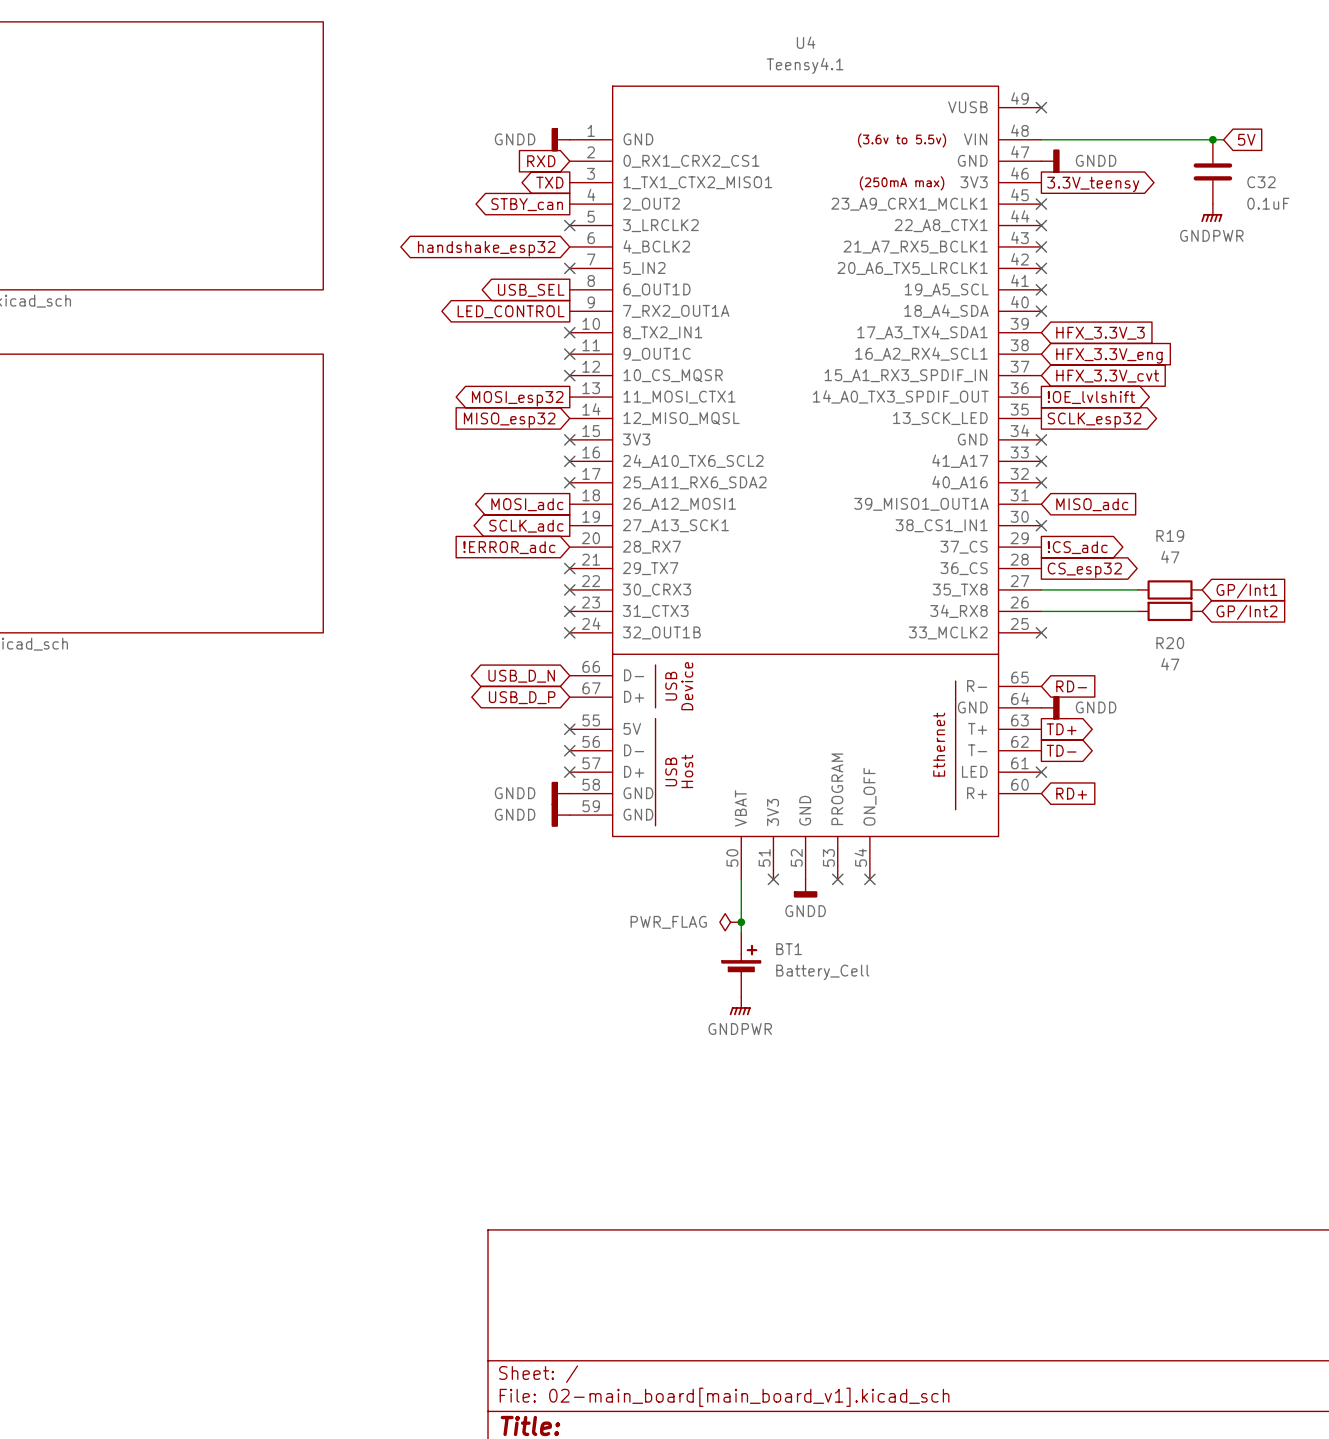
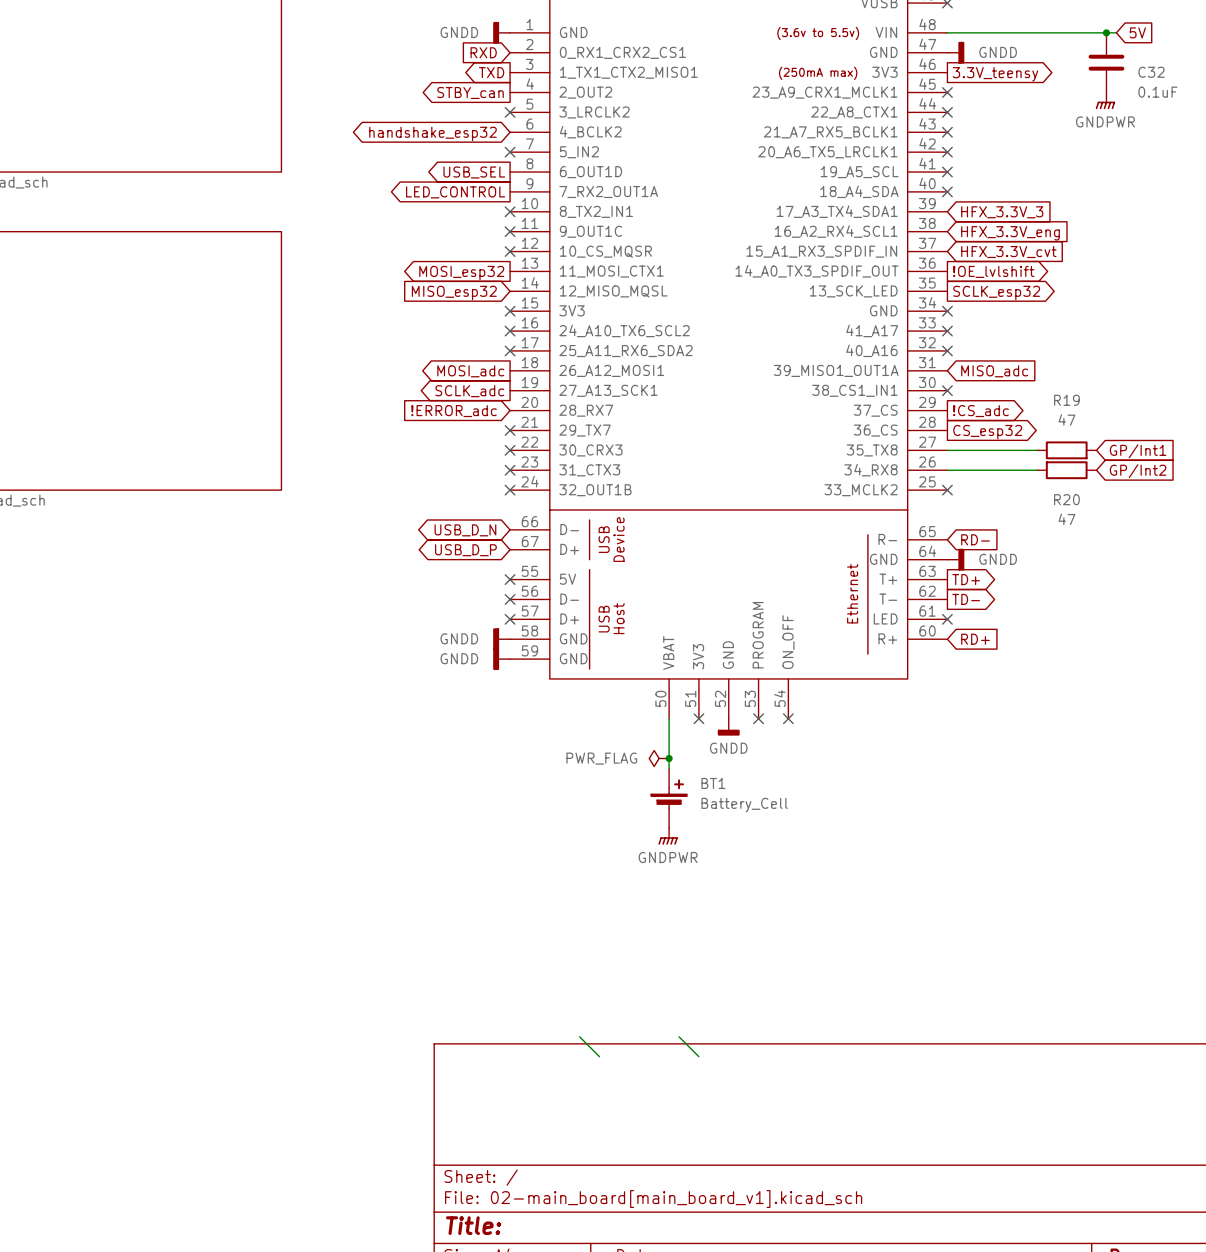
wire: none -> (579, 1036) (599, 1056)
wire: none -> (679, 1036) (698, 1056)

